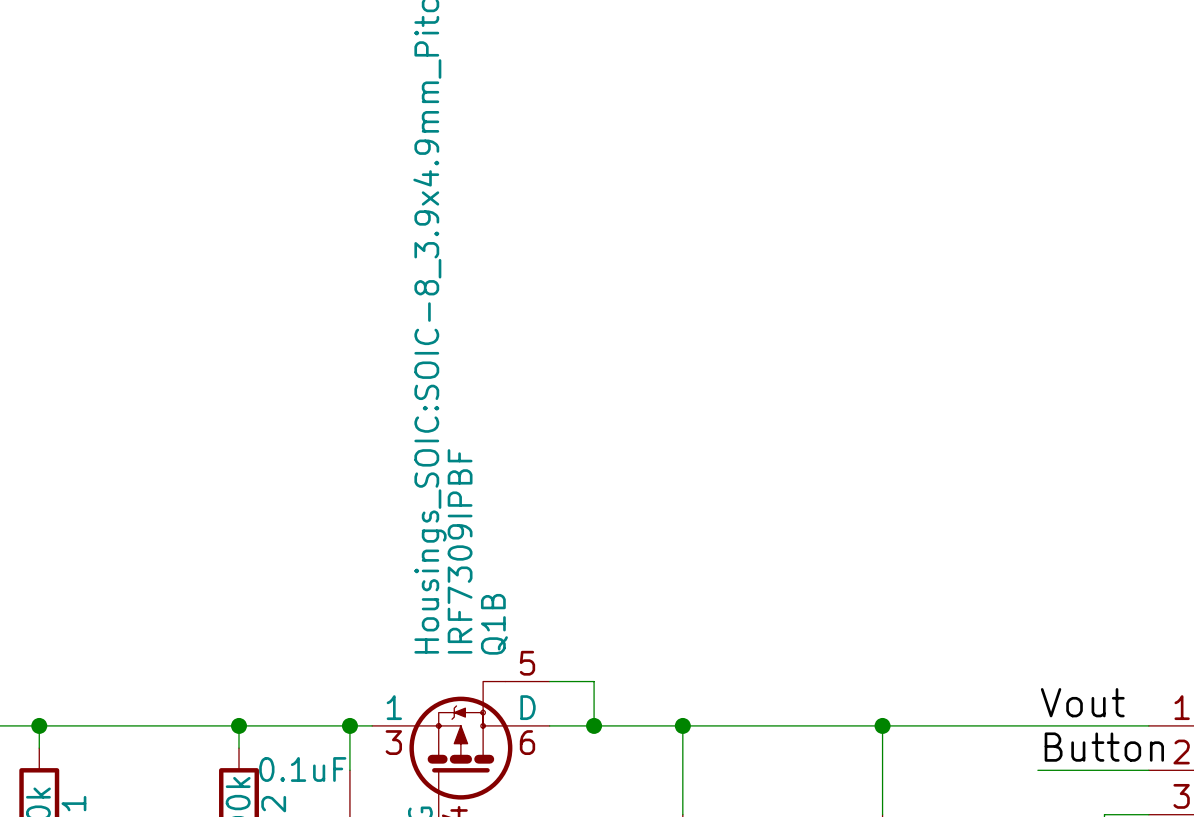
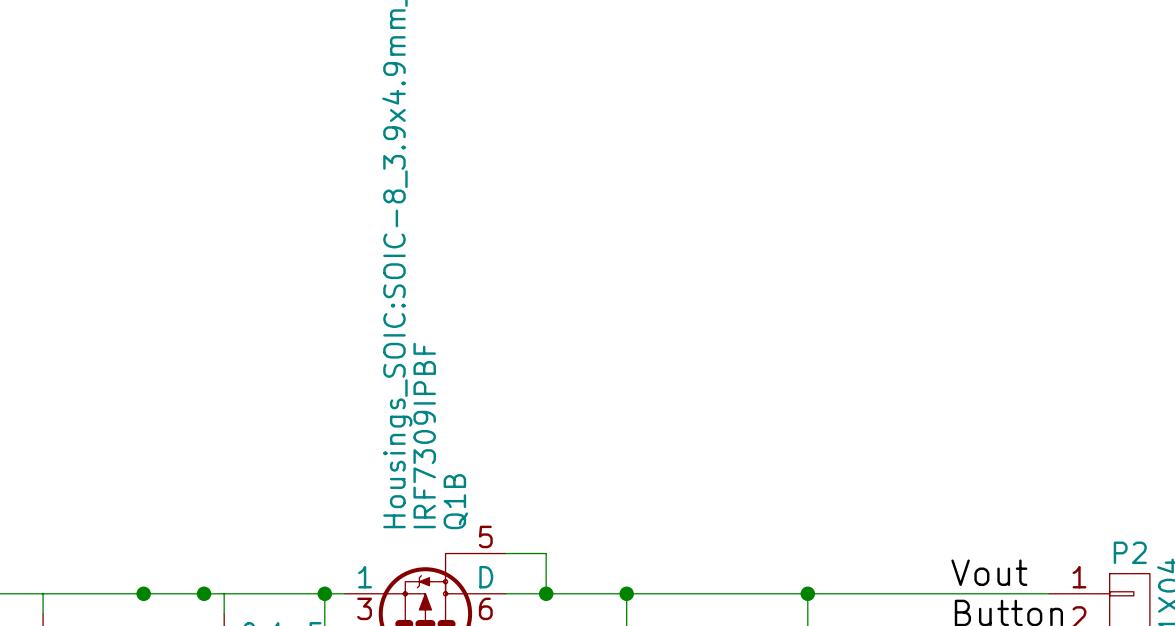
junction: (39, 725) -> none
junction: none -> (143, 593)
junction position: (239, 725) -> (204, 593)

